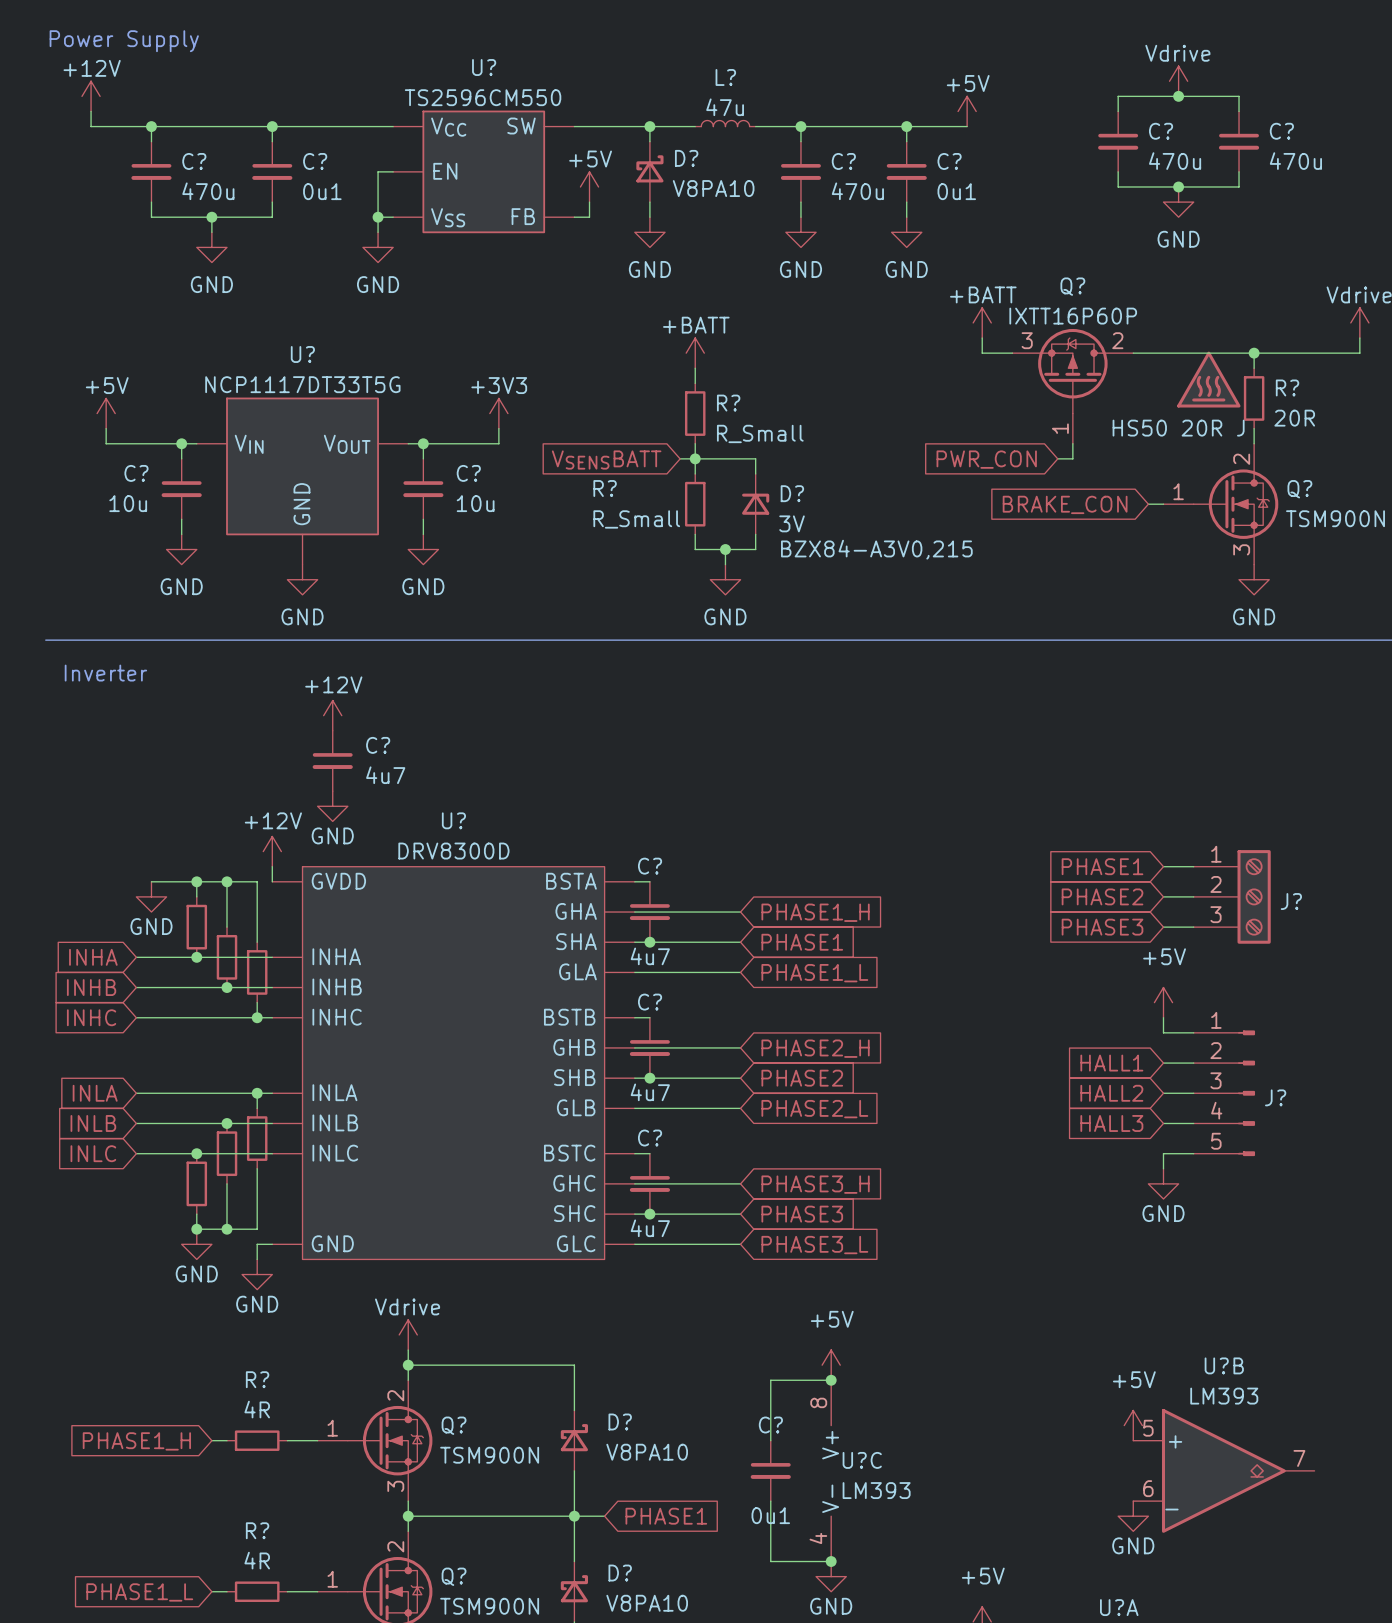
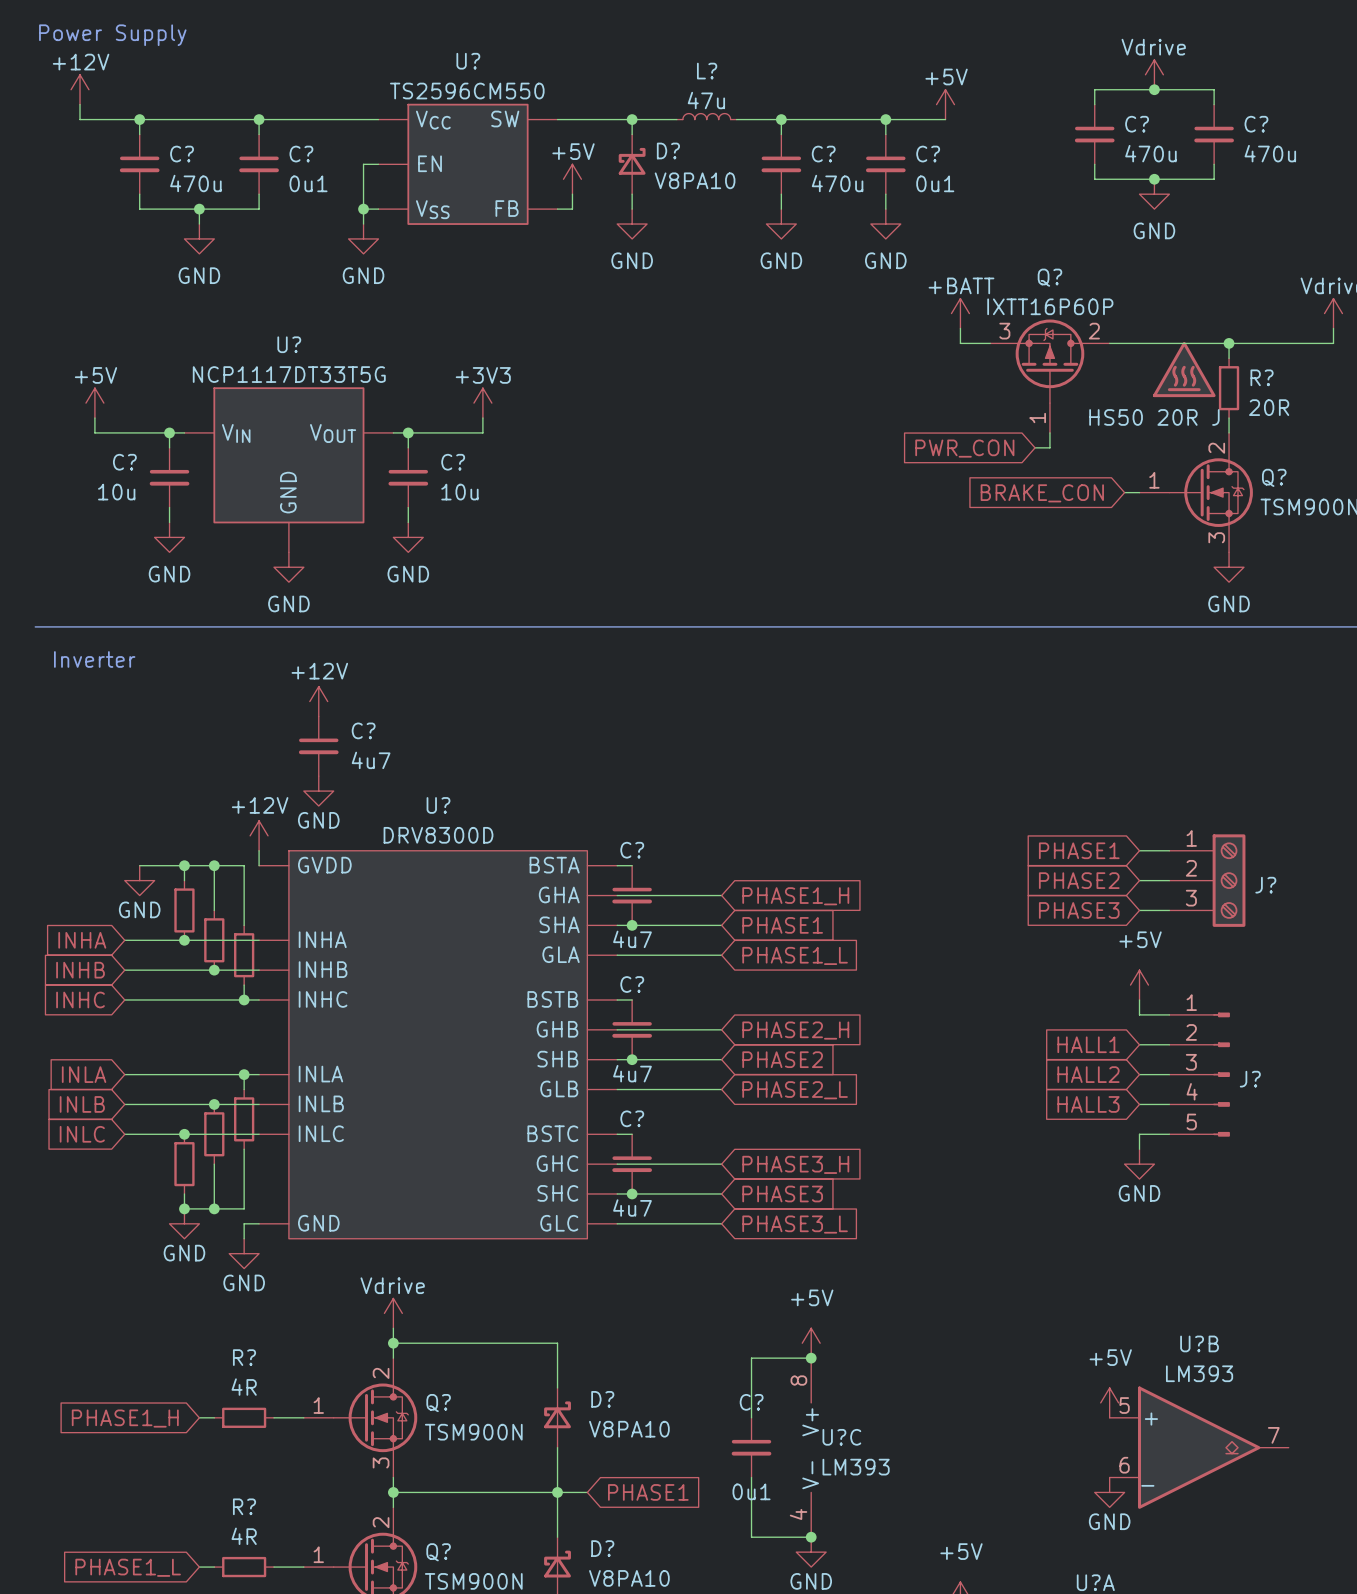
power symbol: +BATT (695, 353) -> none
wire: (695, 368) (695, 383) -> none
R?: R_Small (695, 413) -> none
wire: (695, 443) (695, 473) -> none
wire: (680, 458) (755, 458) (755, 473) -> none
junction: (695, 458) -> none
global label: VSENSBATT (606, 460) -> none
R?: R_Small (695, 504) -> none
D?: 3V (755, 504) -> none
wire: (695, 534) (695, 549) (755, 549) (755, 534) -> none
wire: (725, 549) (725, 564) -> none
junction: (725, 549) -> none
power symbol: GND (725, 579) -> none

